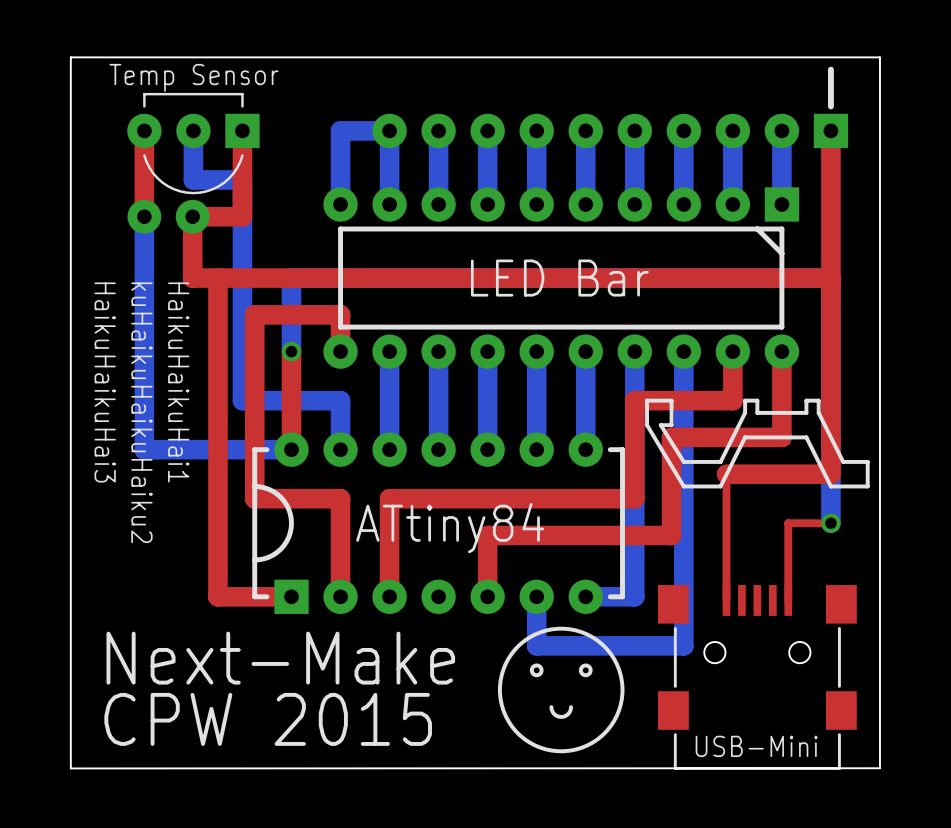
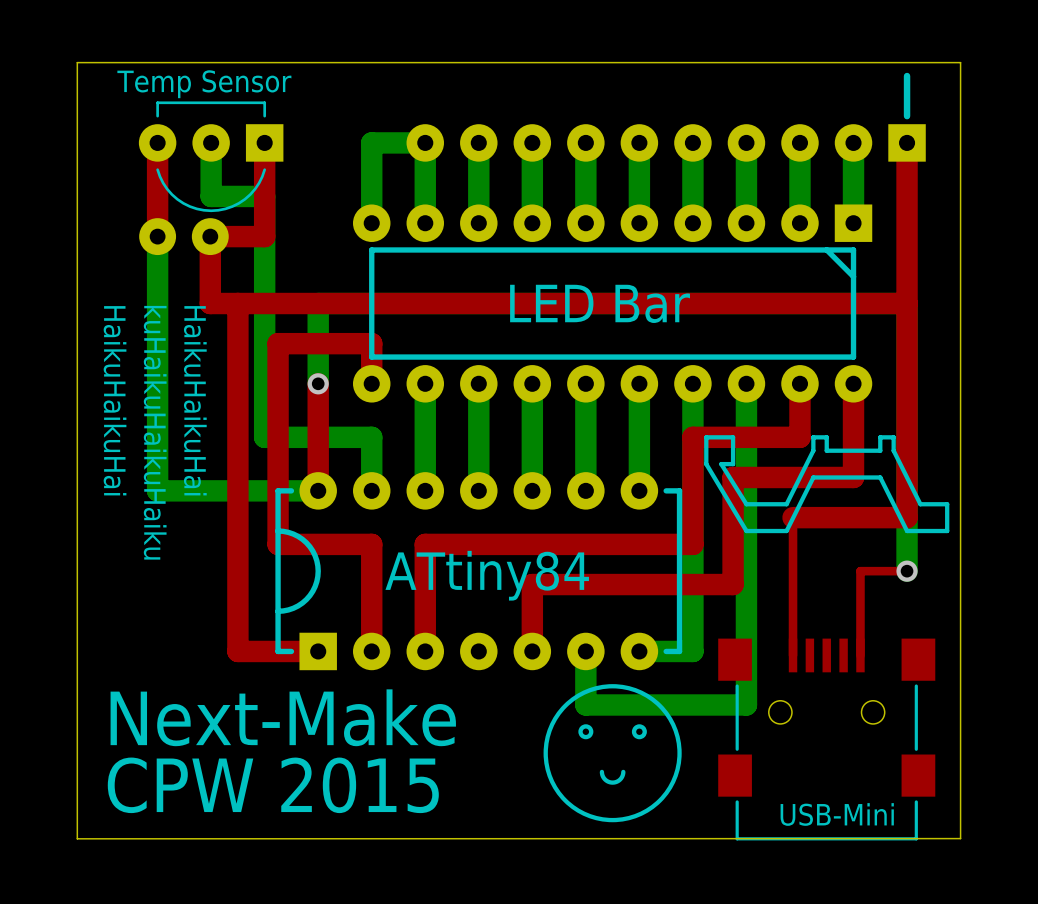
text: HaikuHaikuHai3 (105, 382) -> HaikuHaikuHai (115, 400)
text: HaikuHaikuHai1 (178, 382) -> HaikuHaikuHai (195, 400)
text: kuHaikuHaikuHaiku2 (141, 412) -> kuHaikuHaikuHaiku (155, 432)

